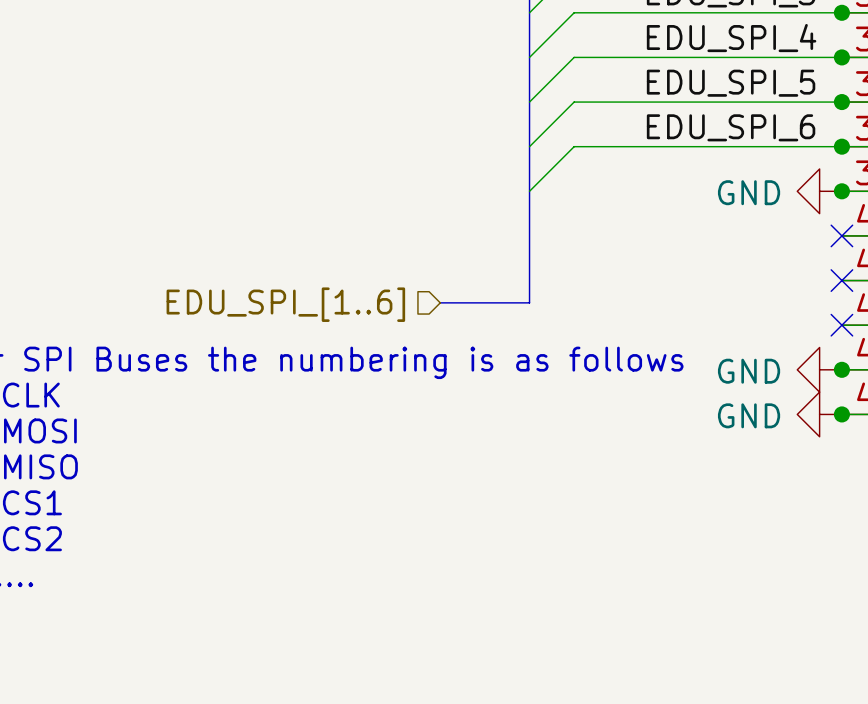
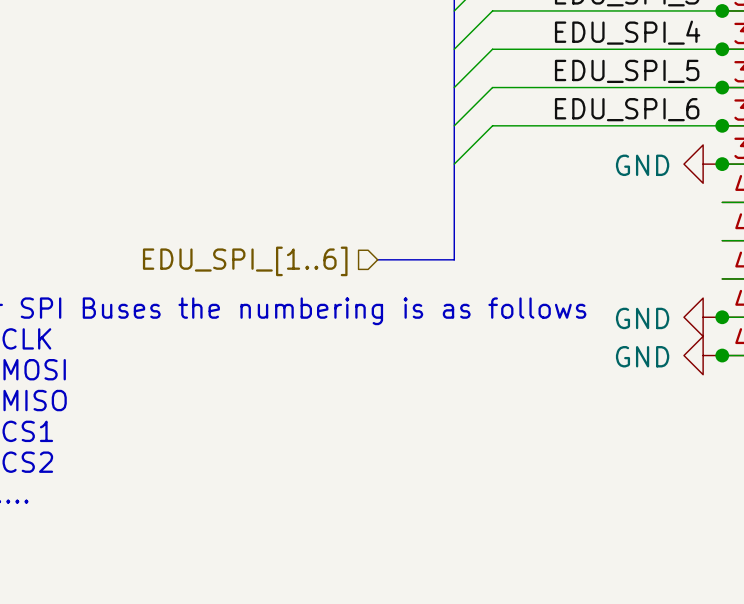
no-connect mark: (841, 235) -> none
no-connect mark: (841, 280) -> none
no-connect mark: (841, 325) -> none

